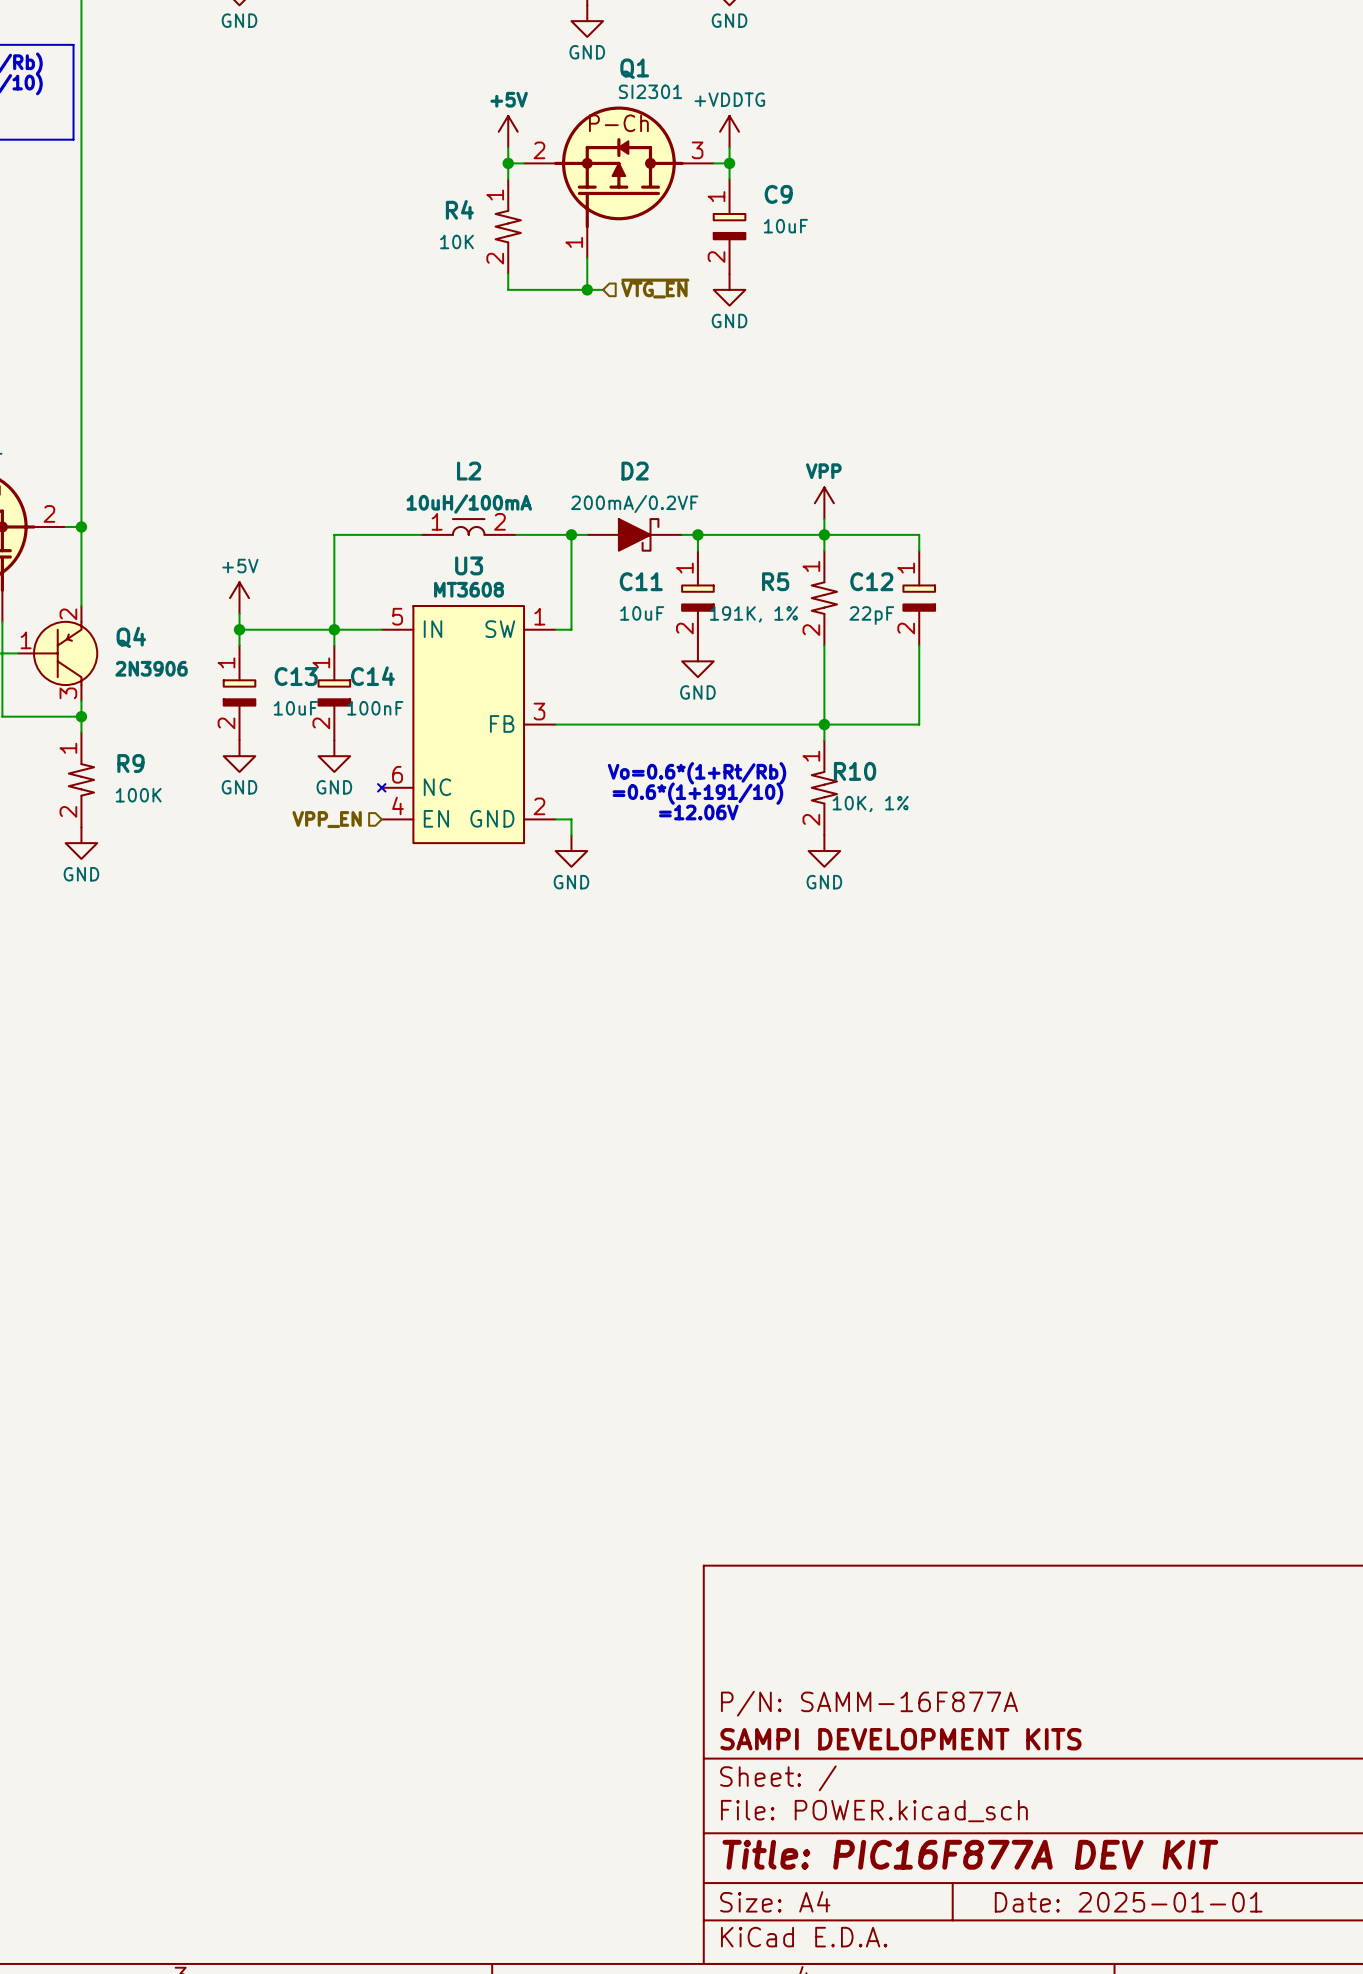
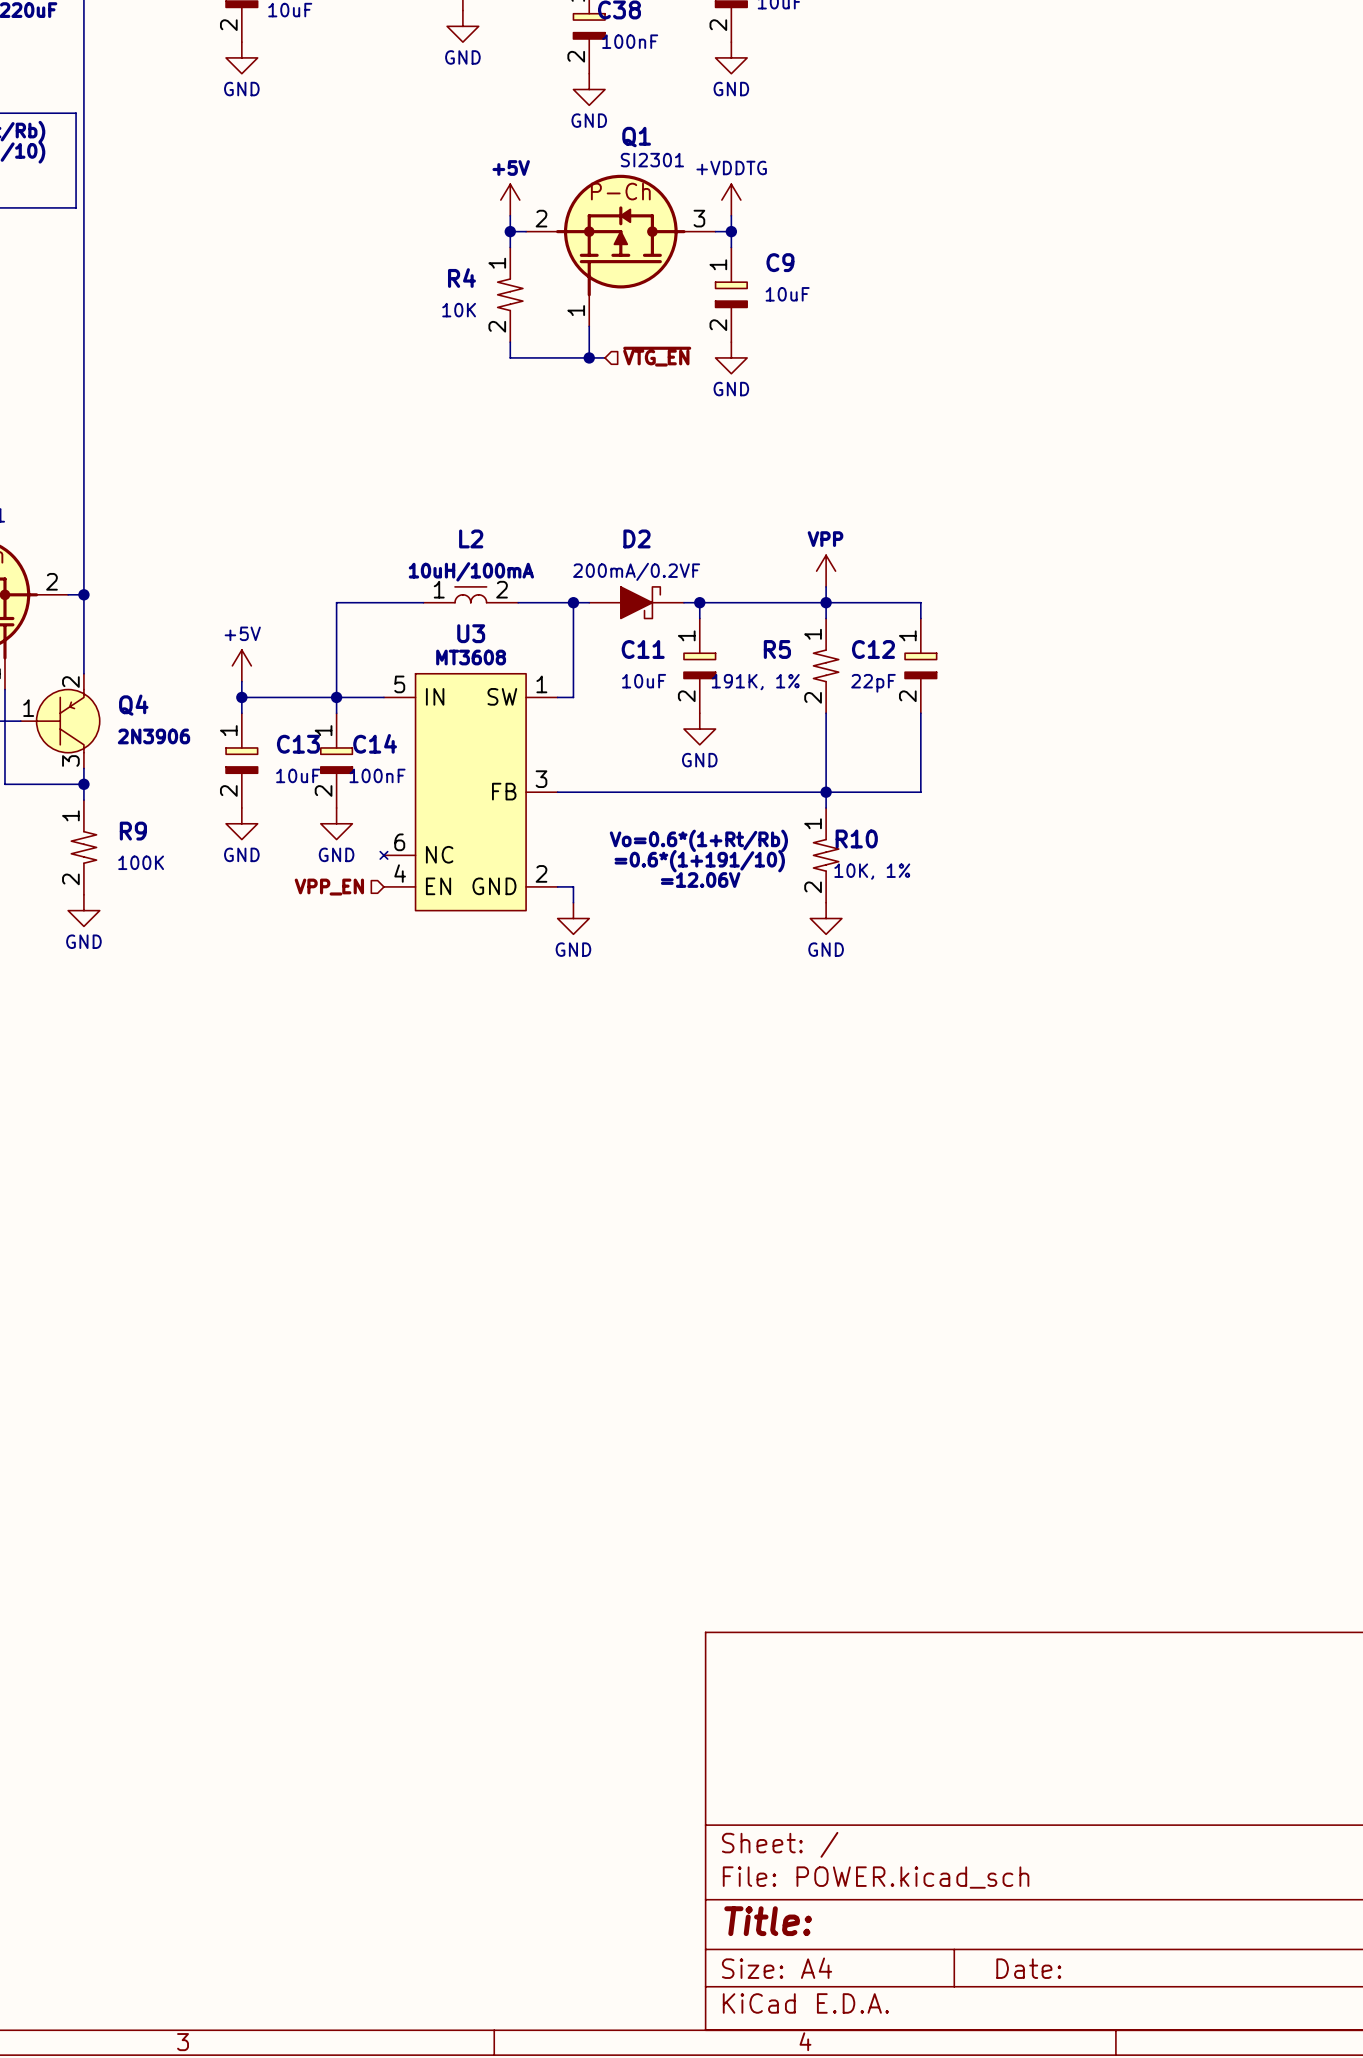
title block: P/N: SAMM-16F877A (869, 1703) -> none
title block: SAMPI DEVELOPMENT KITS (900, 1739) -> none
title block: Title: PIC16F877A DEV KIT (970, 1854) -> Title: (768, 1921)
title block: Date: 2025-01-01 (1128, 1902) -> Date: (1028, 1968)

